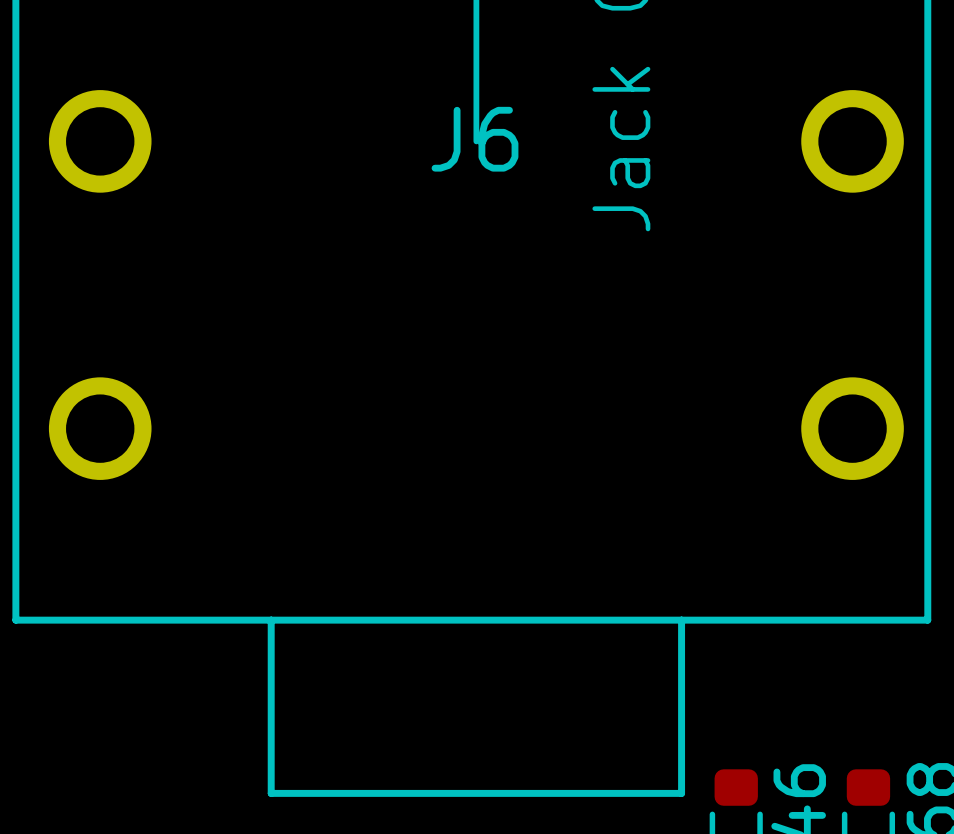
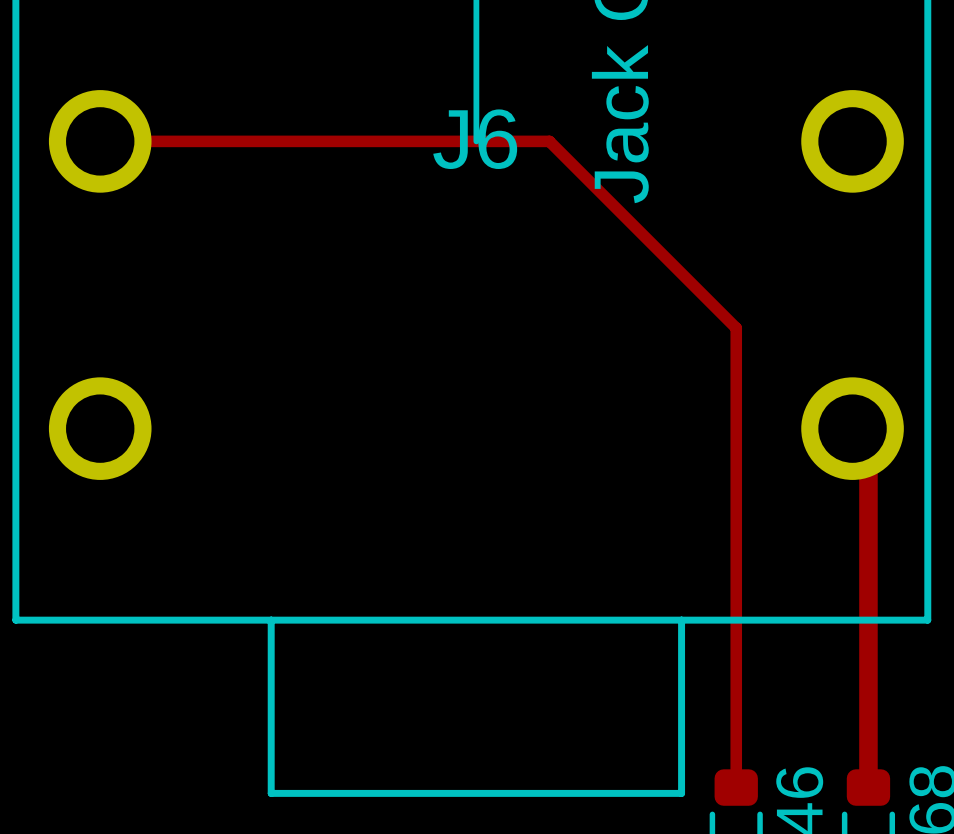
track: none -> (100, 141) (549, 141) (736, 328) (736, 787)
track: none -> (852, 428) (868, 444) (868, 787)

